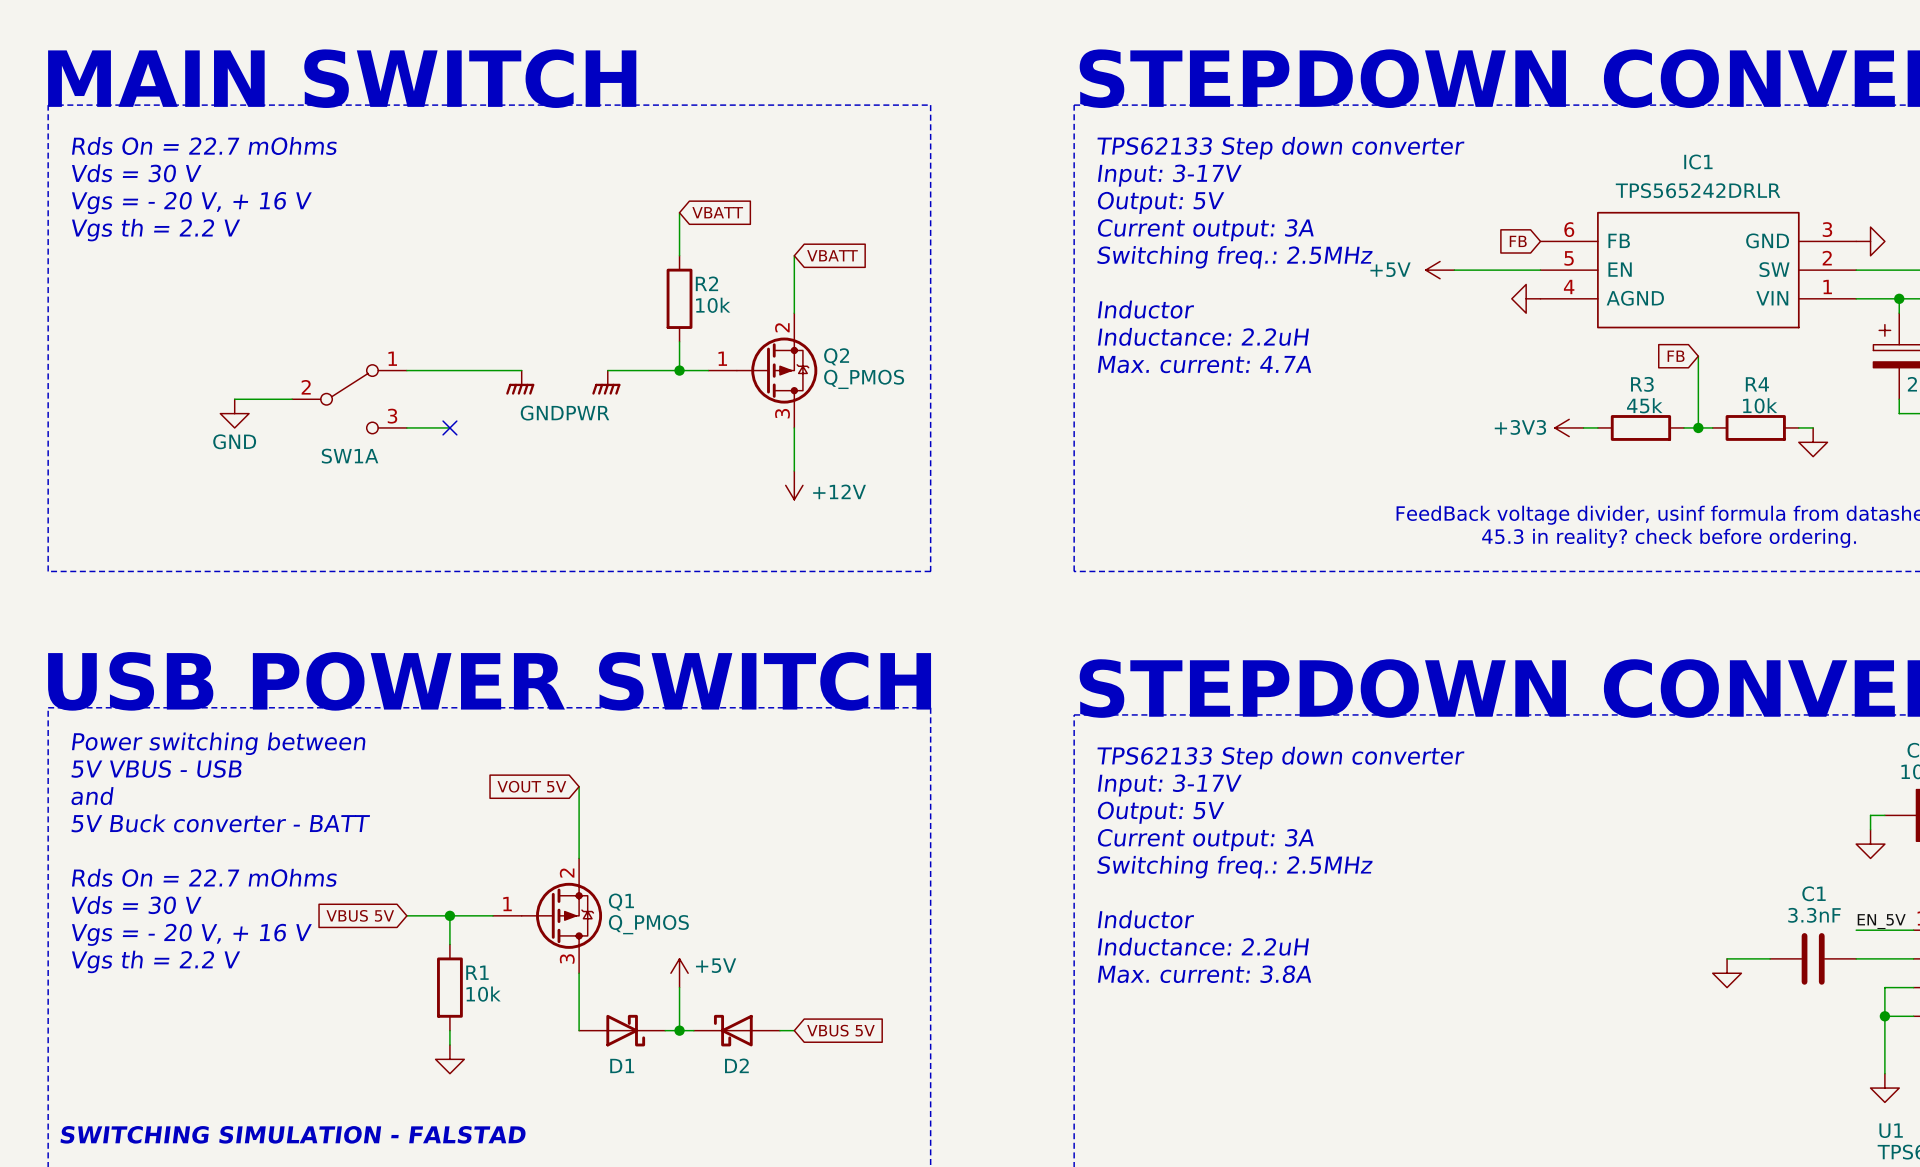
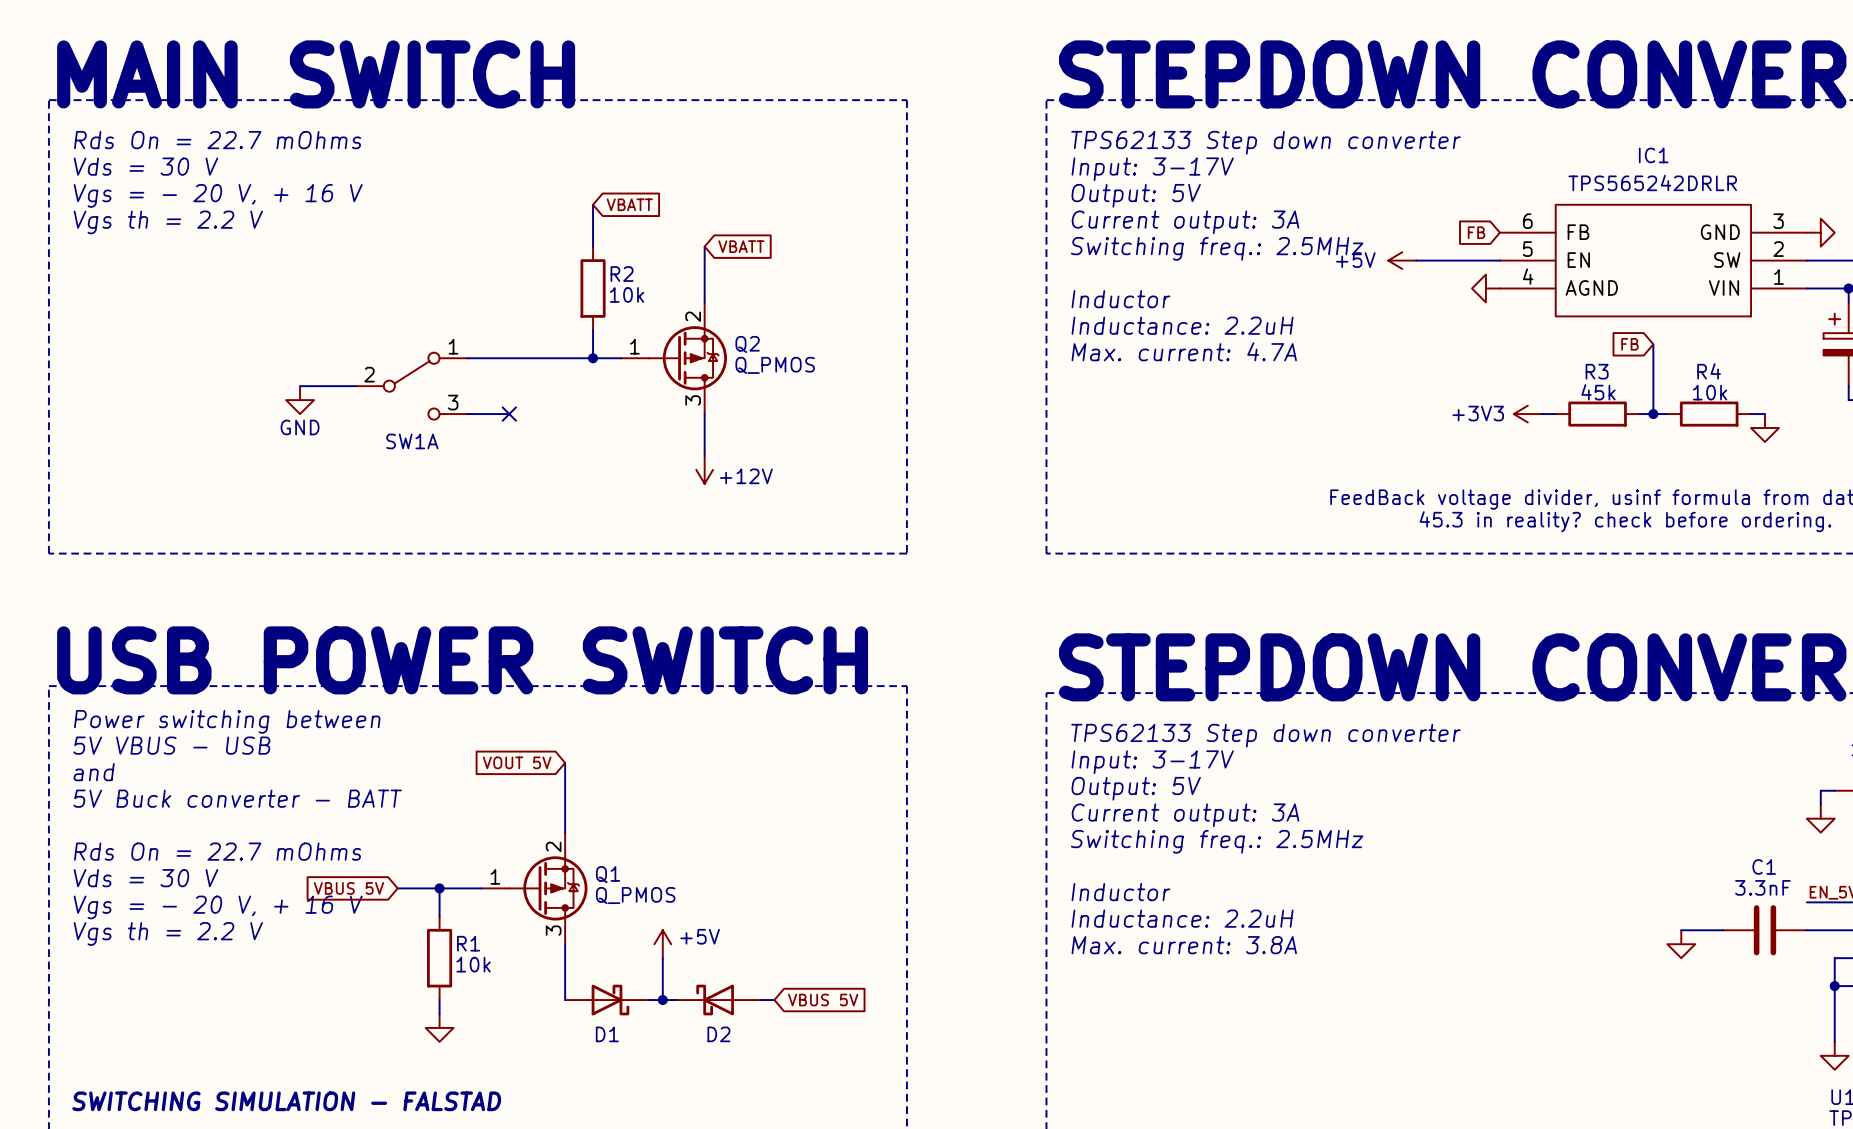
wire: (679, 212) (679, 255) -> (593, 204) (593, 246)
global label position: VBATT (717, 212) -> VBATT (629, 204)
wire: (794, 255) (794, 313) -> (704, 246) (704, 302)
global label position: VBATT (832, 255) -> VBATT (741, 246)
R2 position: (679, 298) -> (593, 288)
wire: none -> (593, 330) (593, 358) (509, 358)
wire: (679, 341) (679, 370) -> none
wire: (406, 370) (478, 370) -> none
junction: none -> (593, 358)
junction: (679, 370) -> none
Q2 position: (762, 370) -> (673, 358)
power symbol: GNDPWR (520, 382) -> none
power symbol: (606, 382) -> none
wire: (234, 399) (292, 399) -> (300, 386) (355, 386)
SW1A position: (349, 399) -> (411, 386)
power symbol position: GND (234, 413) -> GND (300, 400)
wire: (406, 427) (449, 427) -> (467, 414) (509, 414)
no-connect mark: (449, 427) -> none
no-connect mark: none -> (509, 414)
wire: (794, 427) (794, 471) -> (704, 414) (704, 455)
power symbol position: +12V (794, 485) -> +12V (704, 469)

